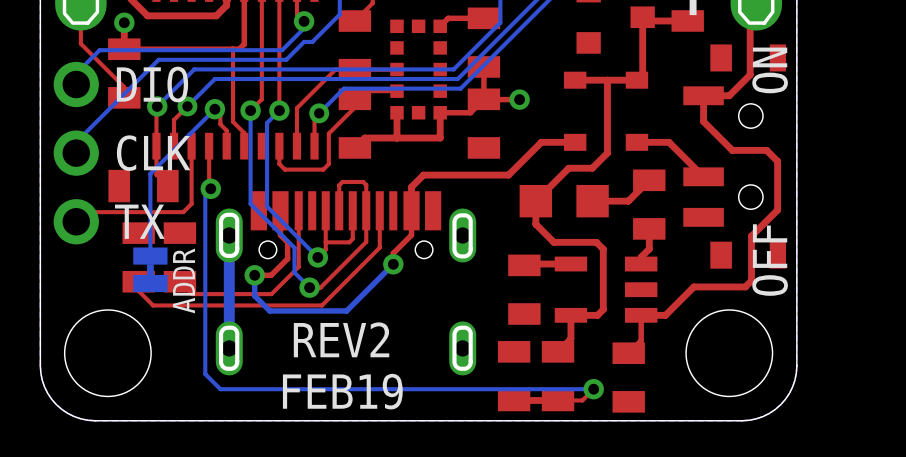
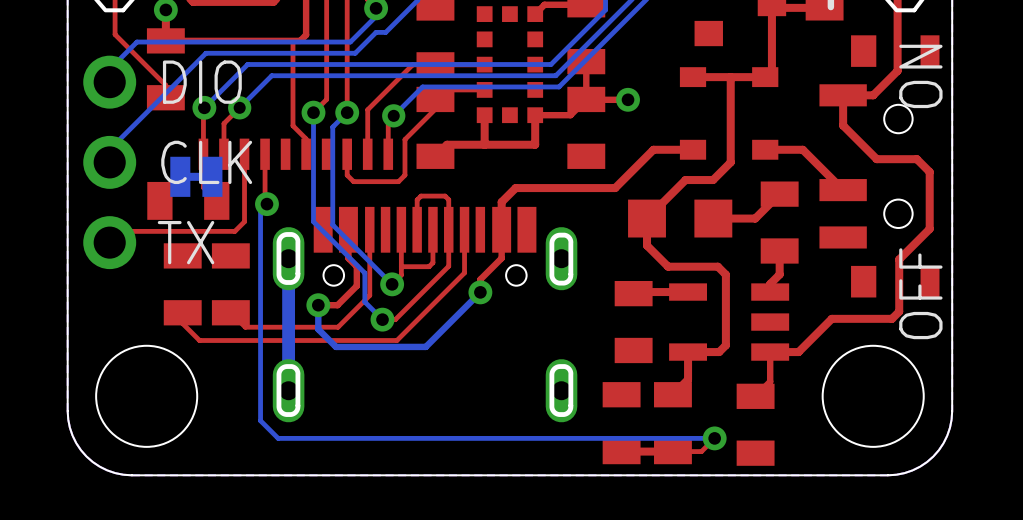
top track: (214, 109) (220, 114) (220, 124) (226, 130) (226, 146) -> none
bottom track: (214, 109) (150, 173) (150, 256) -> none
via: (214, 109) -> none
part rotation: 0° (150, 269) -> 90° clockwise (196, 176)
part position: (150, 269) -> (196, 176)
text: ADDR (184, 280) -> none
text: REV2 (341, 339) -> none
text: FEB19 (342, 391) -> none

